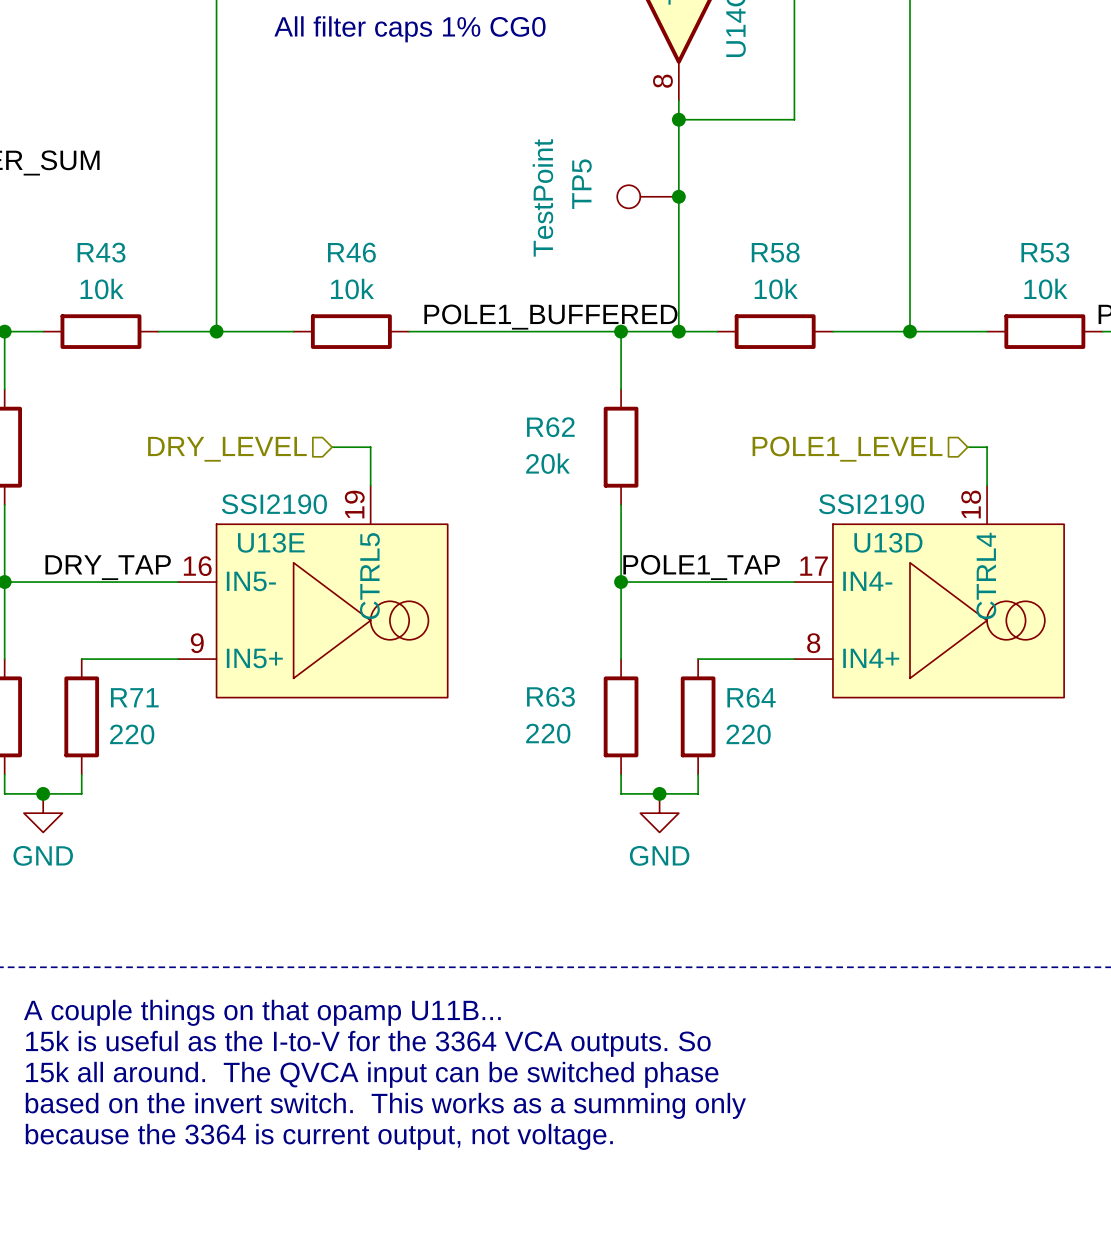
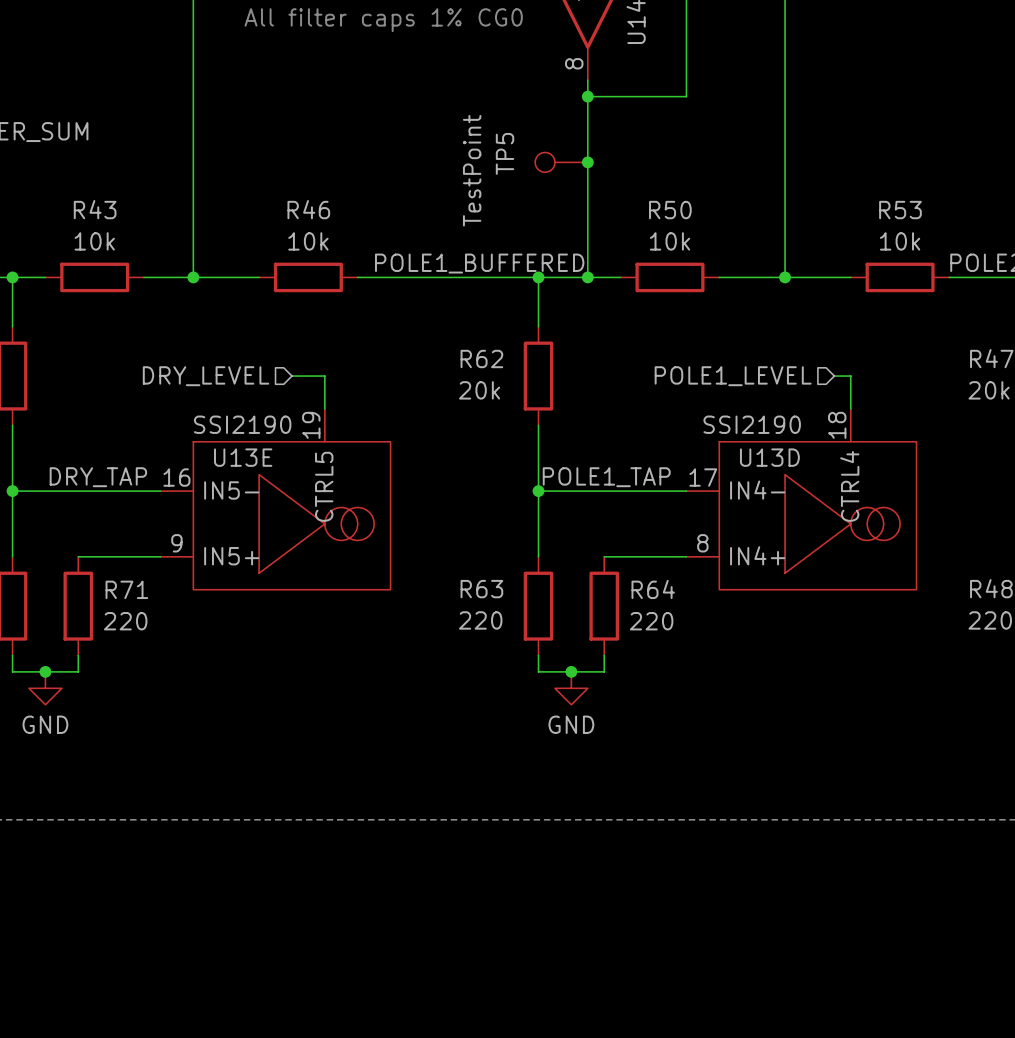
R58 name: R58 (775, 252) -> R50 (670, 210)
text: A couple things on that opamp U11B... (262, 1012) -> none
text: 15k is useful as the I-to-V for the 3364 VCA outputs. So (368, 1043) -> none
text: 15k all around. The QVCA input can be switched phase (372, 1074) -> none
text: based on the invert switch. This works as a summing only (385, 1105) -> none
text: because the 3364 is current output, not voltage. (319, 1136) -> none

